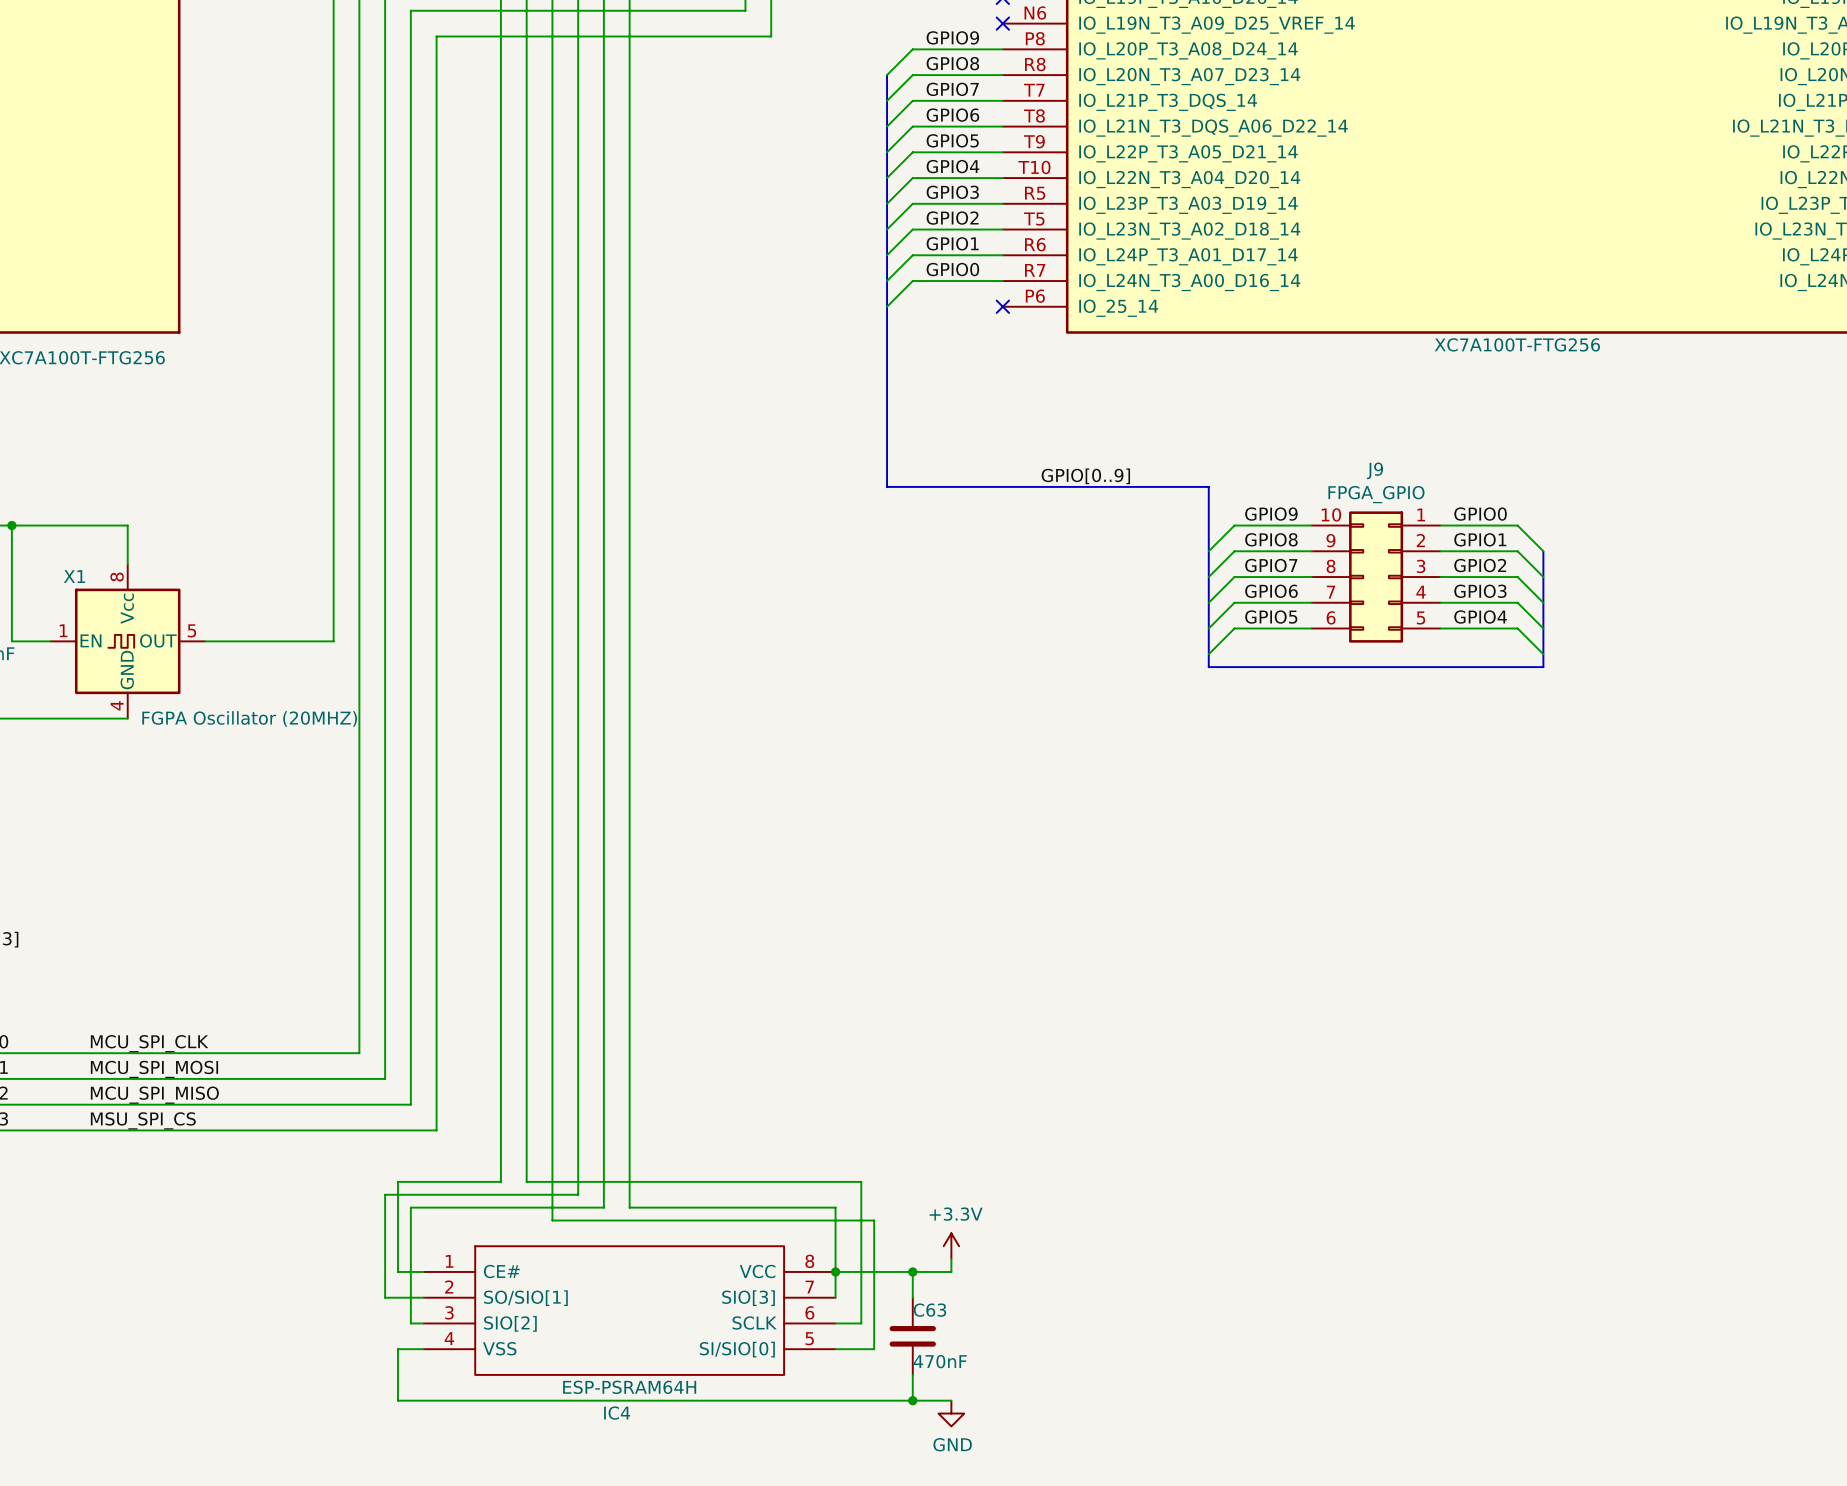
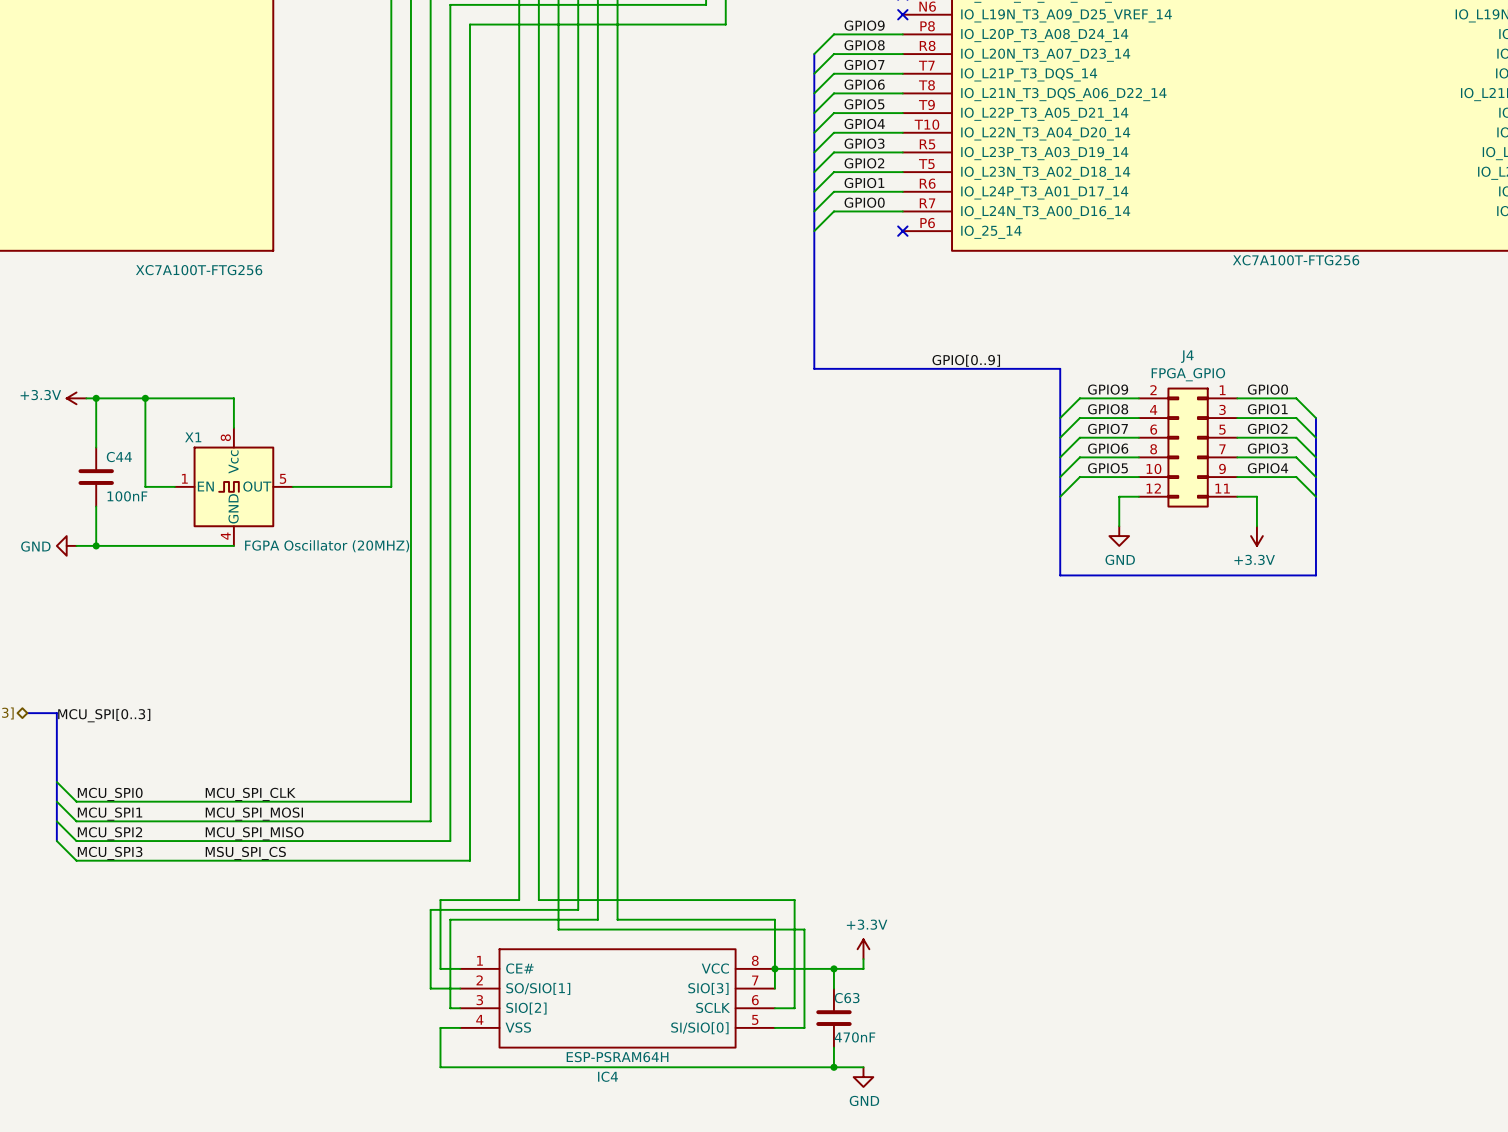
J9: FPGA_GPIO (1376, 577) -> none
J4: none -> FPGA_GPIO (1188, 447)
wire: none -> (1138, 496) (1119, 496) (1119, 526)
wire: none -> (1237, 496) (1256, 496) (1256, 526)
bus: (1208, 667) (1543, 667) -> (1060, 506) (1060, 575) (1315, 575) (1315, 506)
power symbol: none -> GND (1119, 536)
power symbol: none -> +3.3V (1256, 536)

